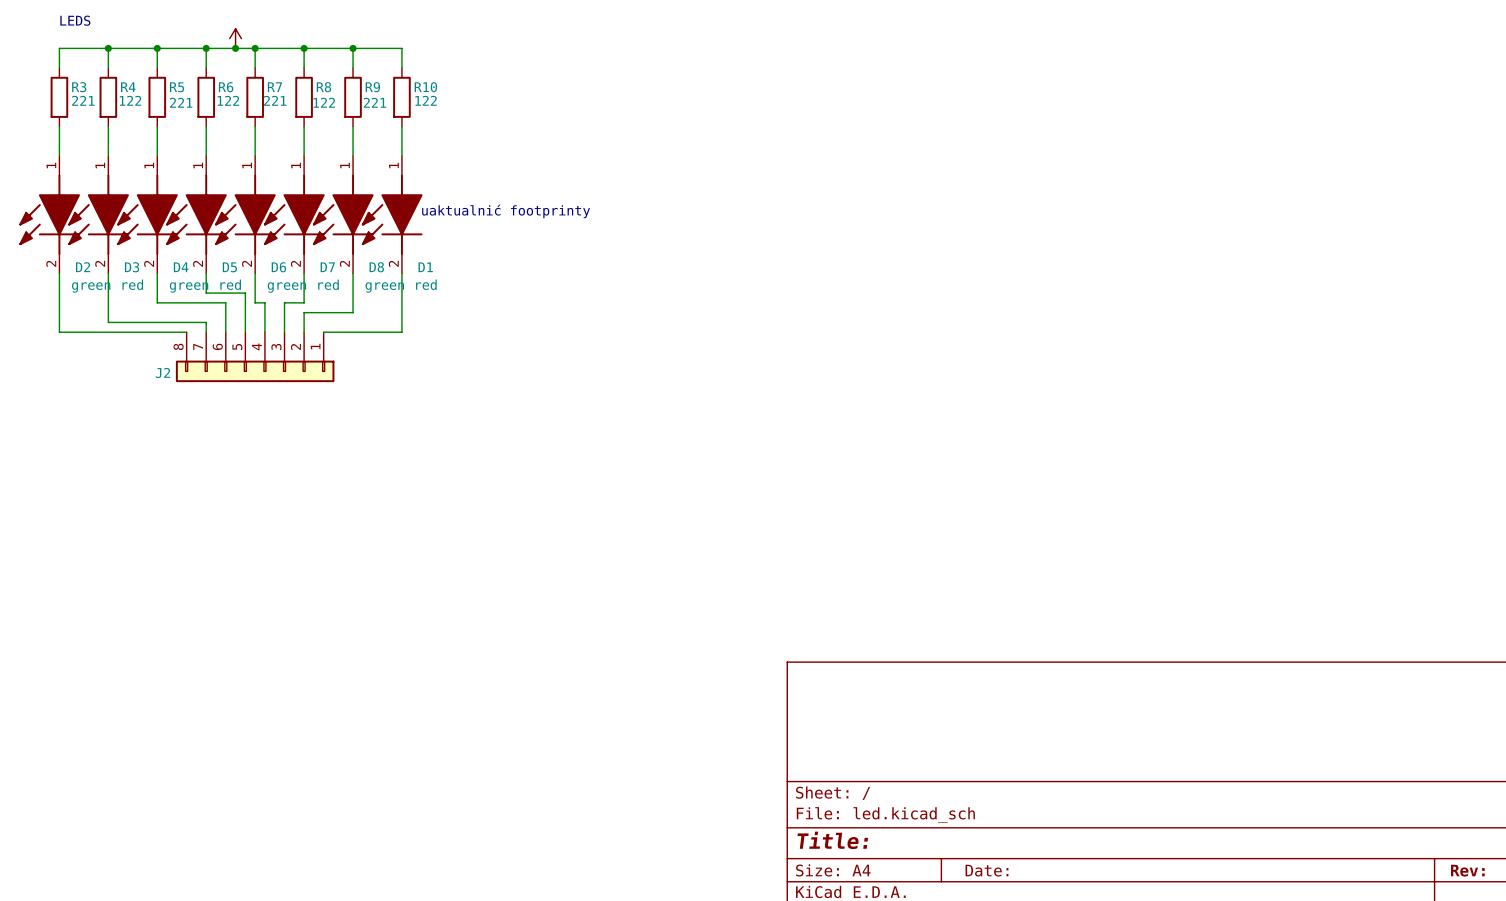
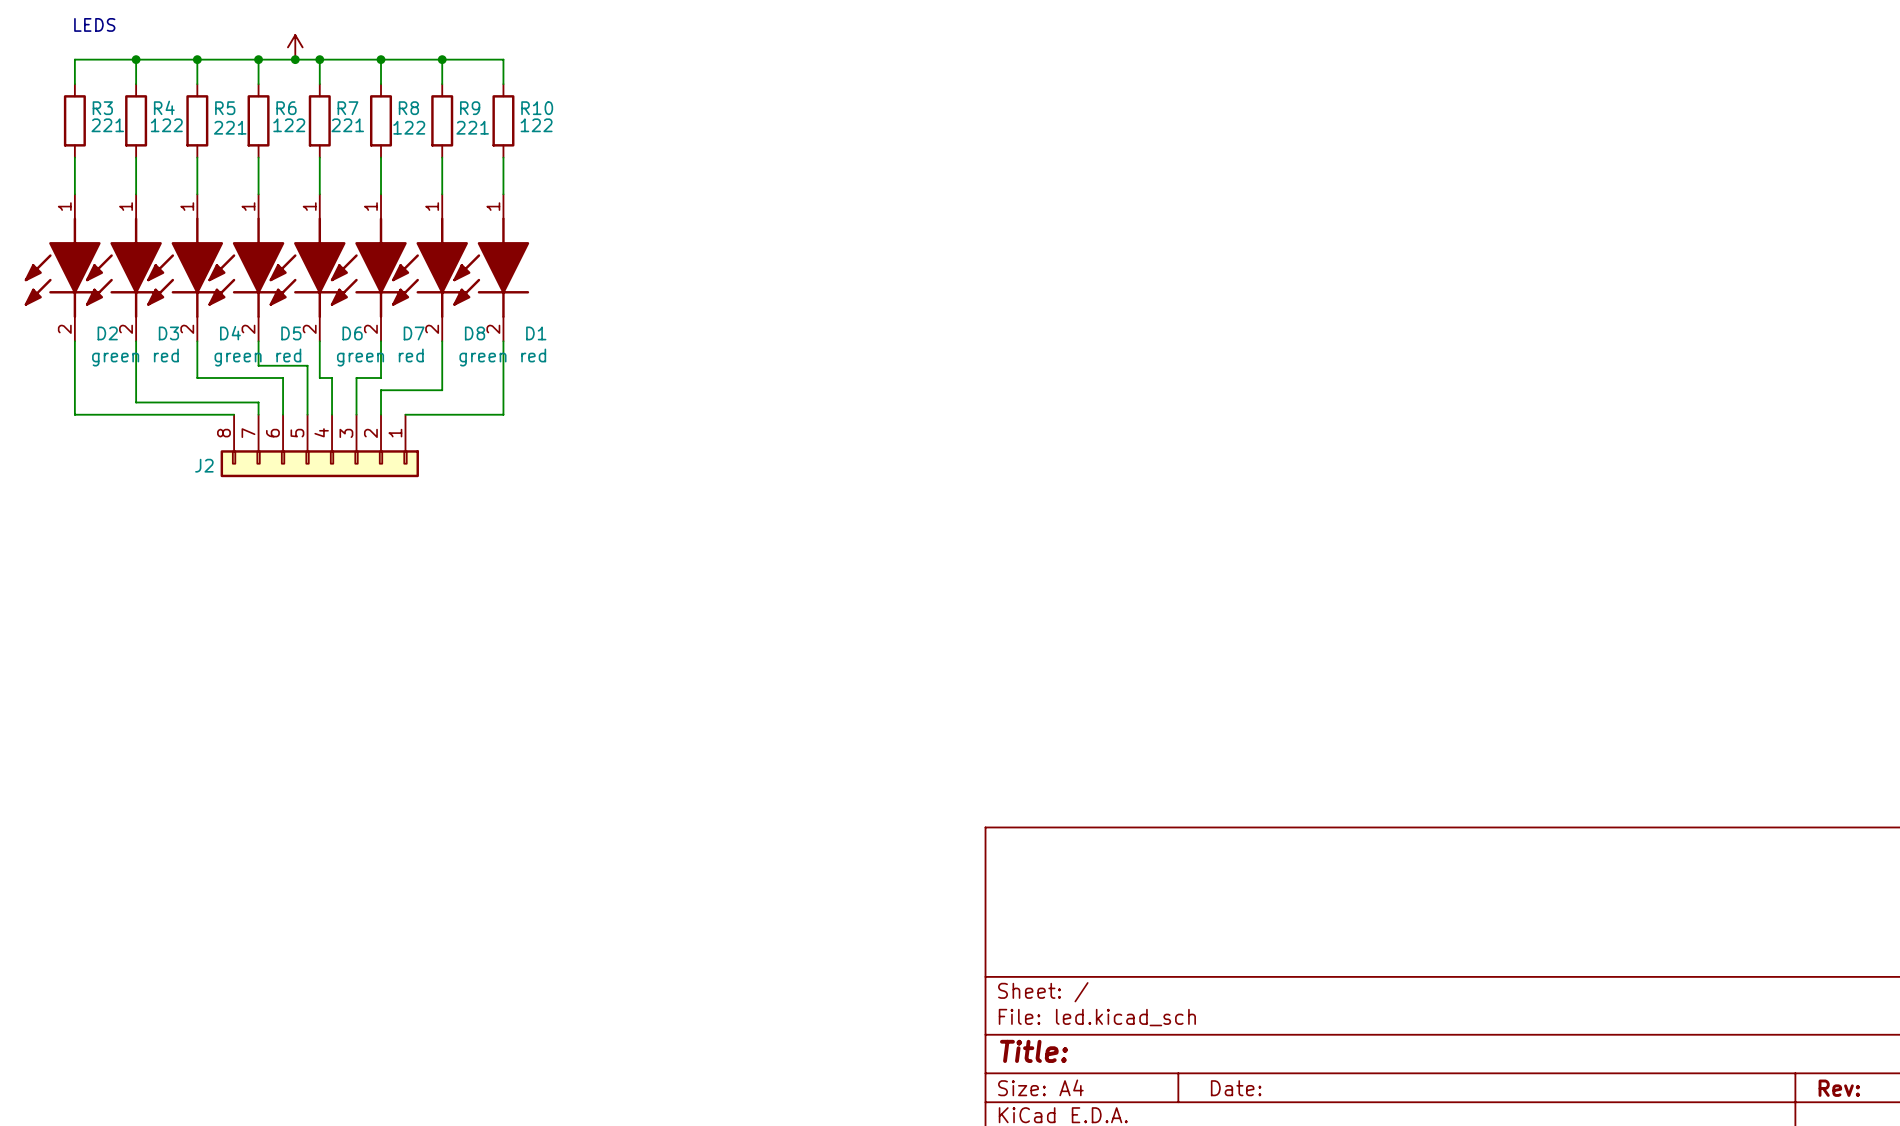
text: uaktualnić footprinty (506, 211) -> none

